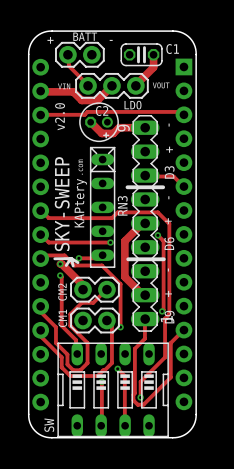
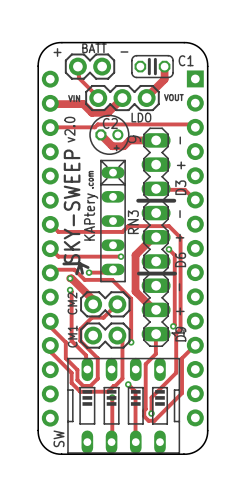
line: none -> (63, 263) (80, 263) (76, 273)
line: none -> (88, 267) (80, 263) (82, 273)
line: (54, 258) (70, 258) (66, 265) -> none
line: (77, 262) (71, 258) (73, 265) -> none

